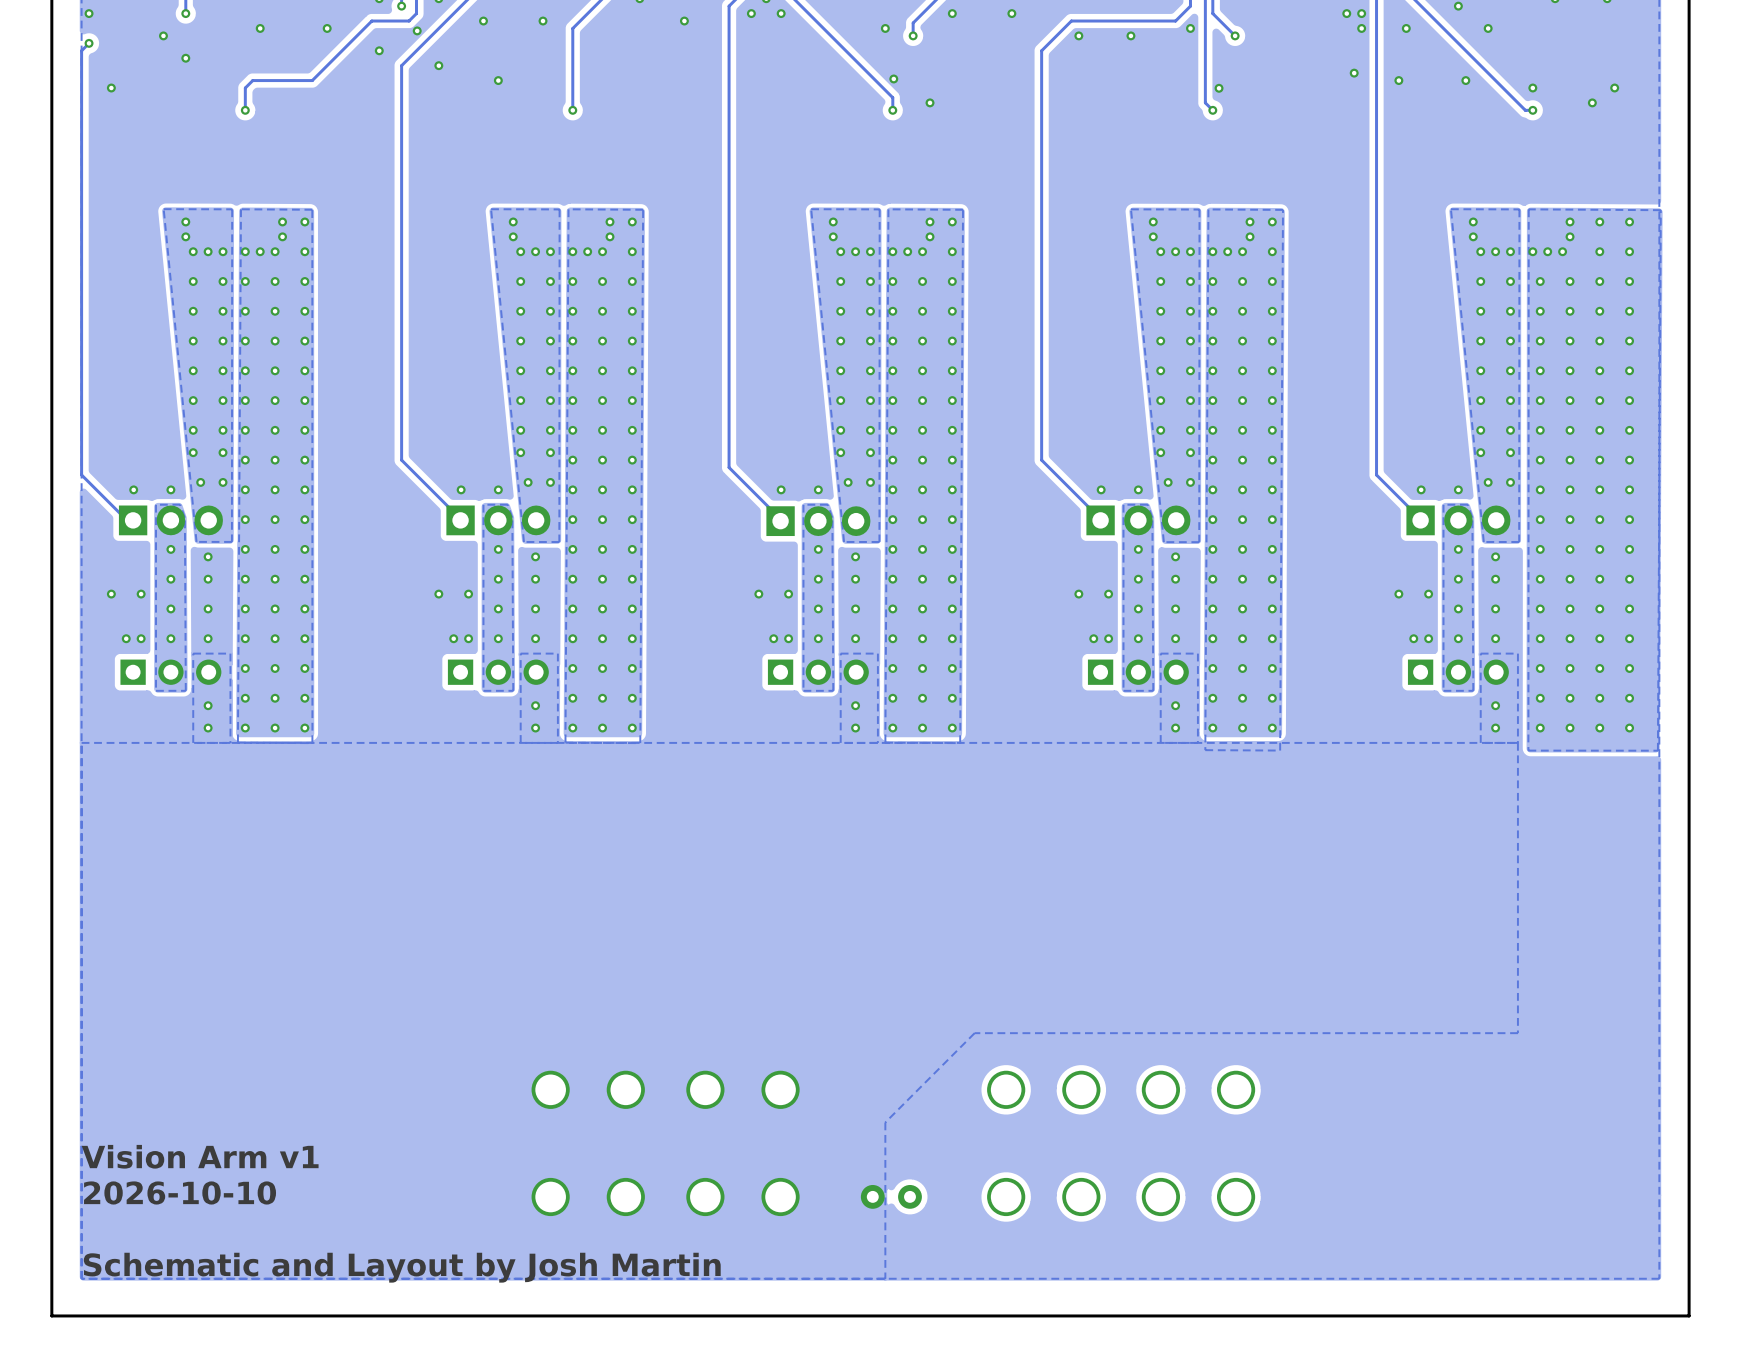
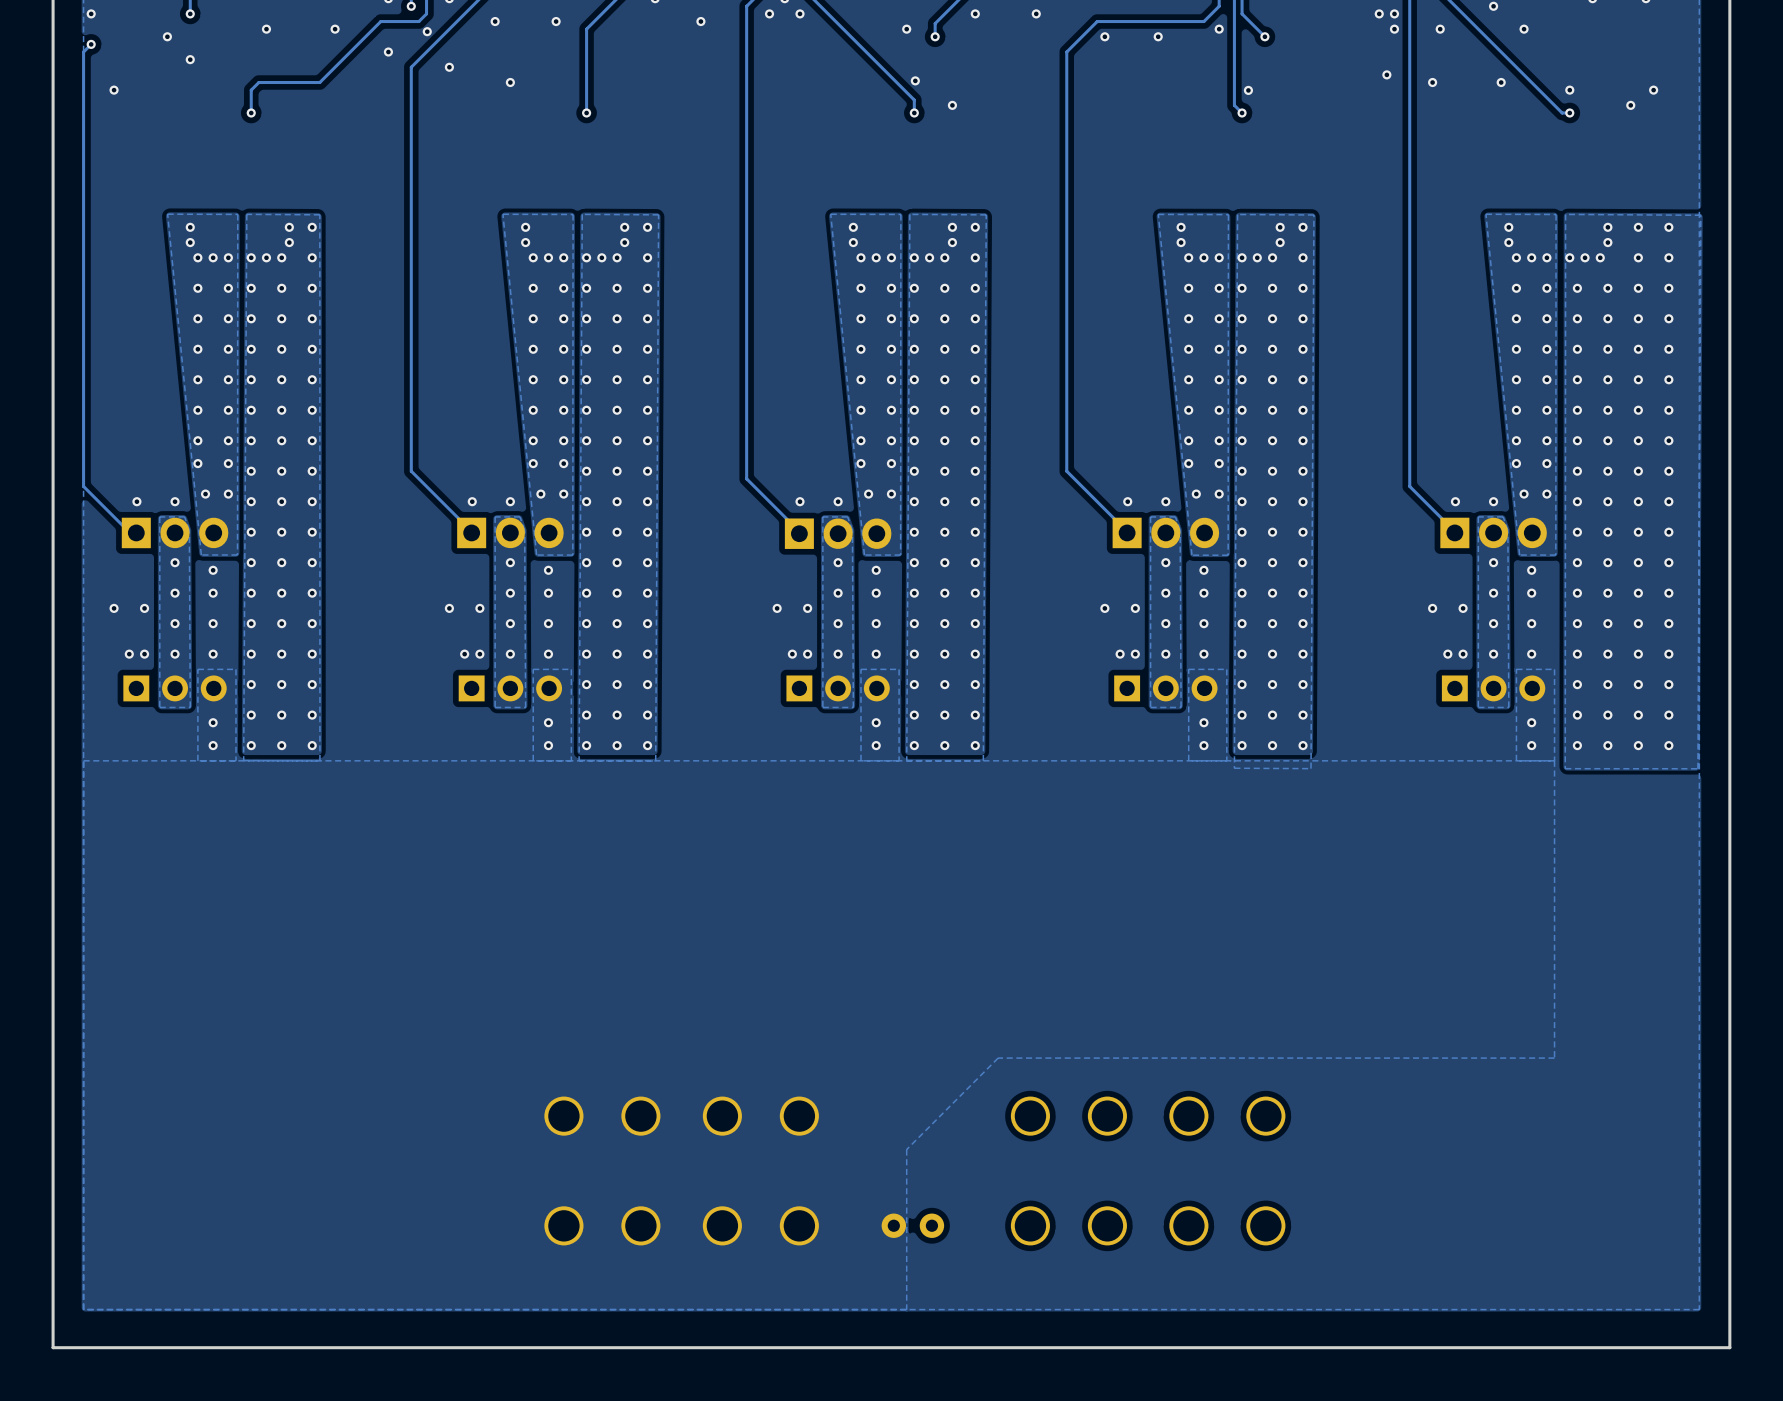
text: Vision Arm v1 (200, 1156) -> none
text: 2026-10-10 (180, 1192) -> none
text: Schematic and Layout by Josh Martin (402, 1267) -> none

